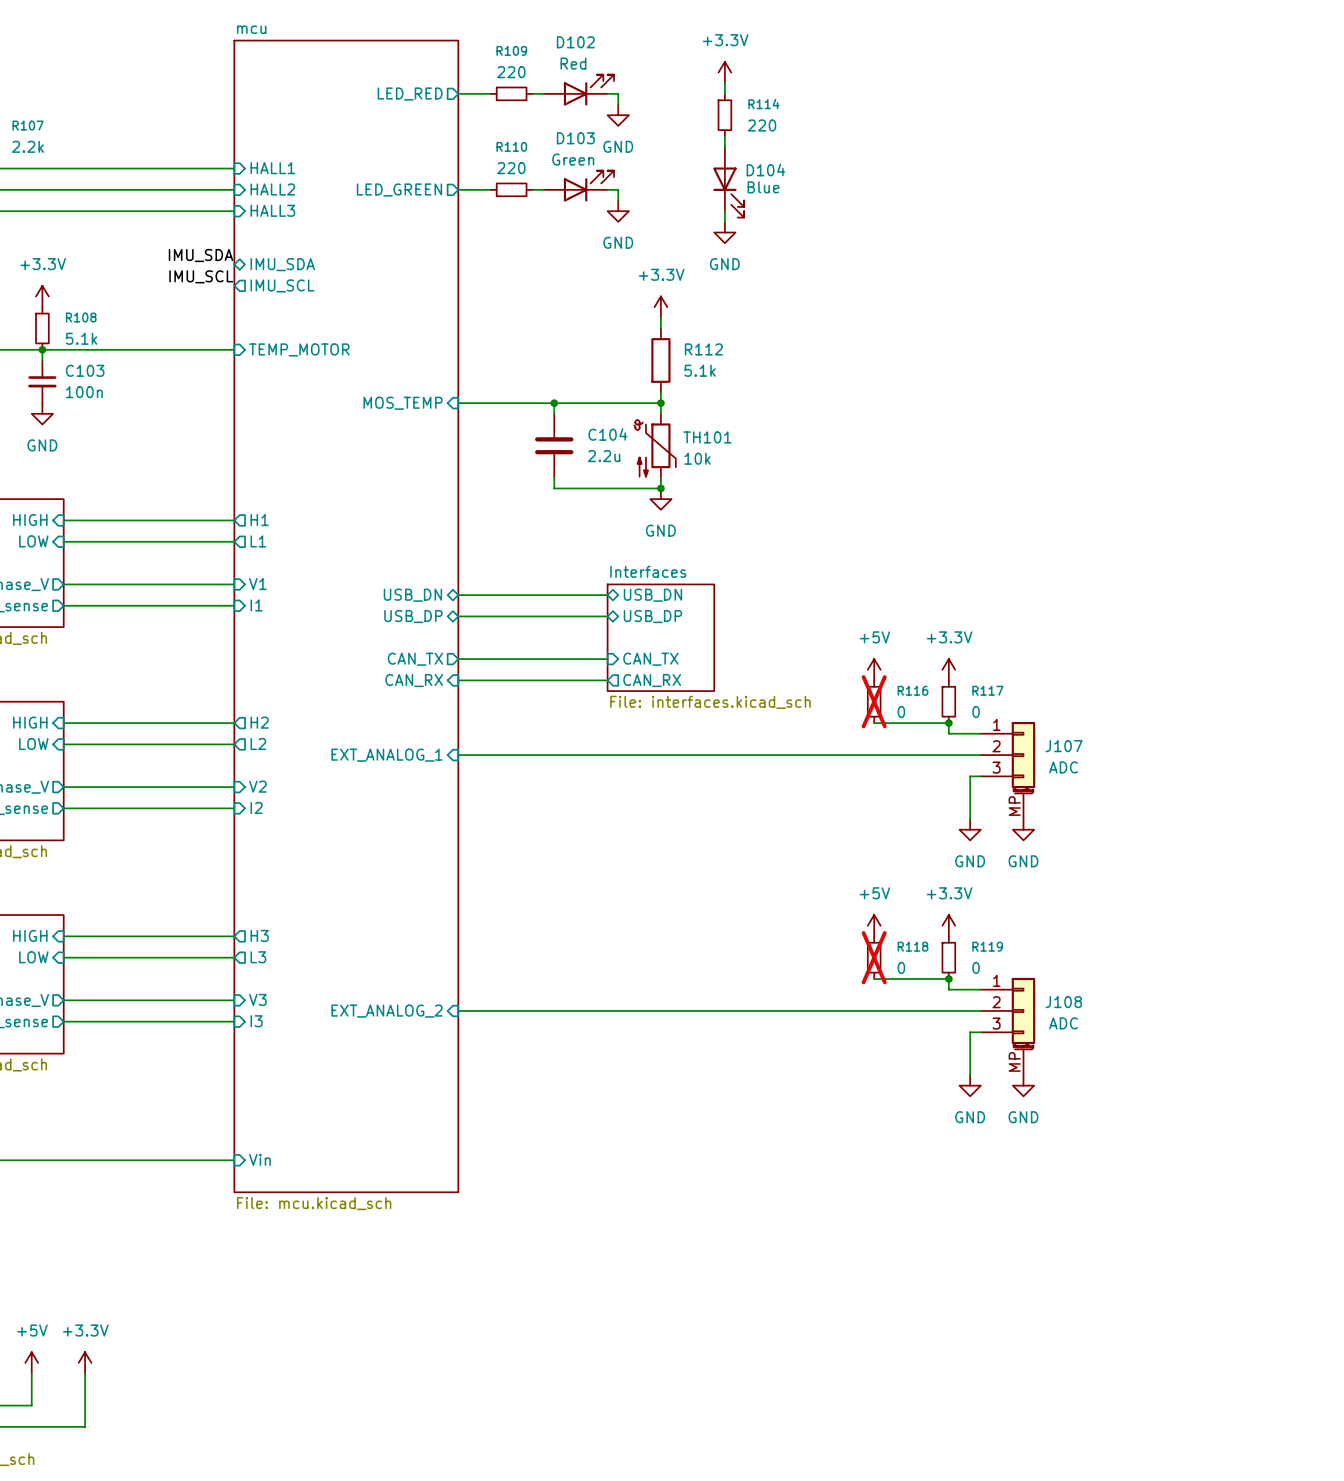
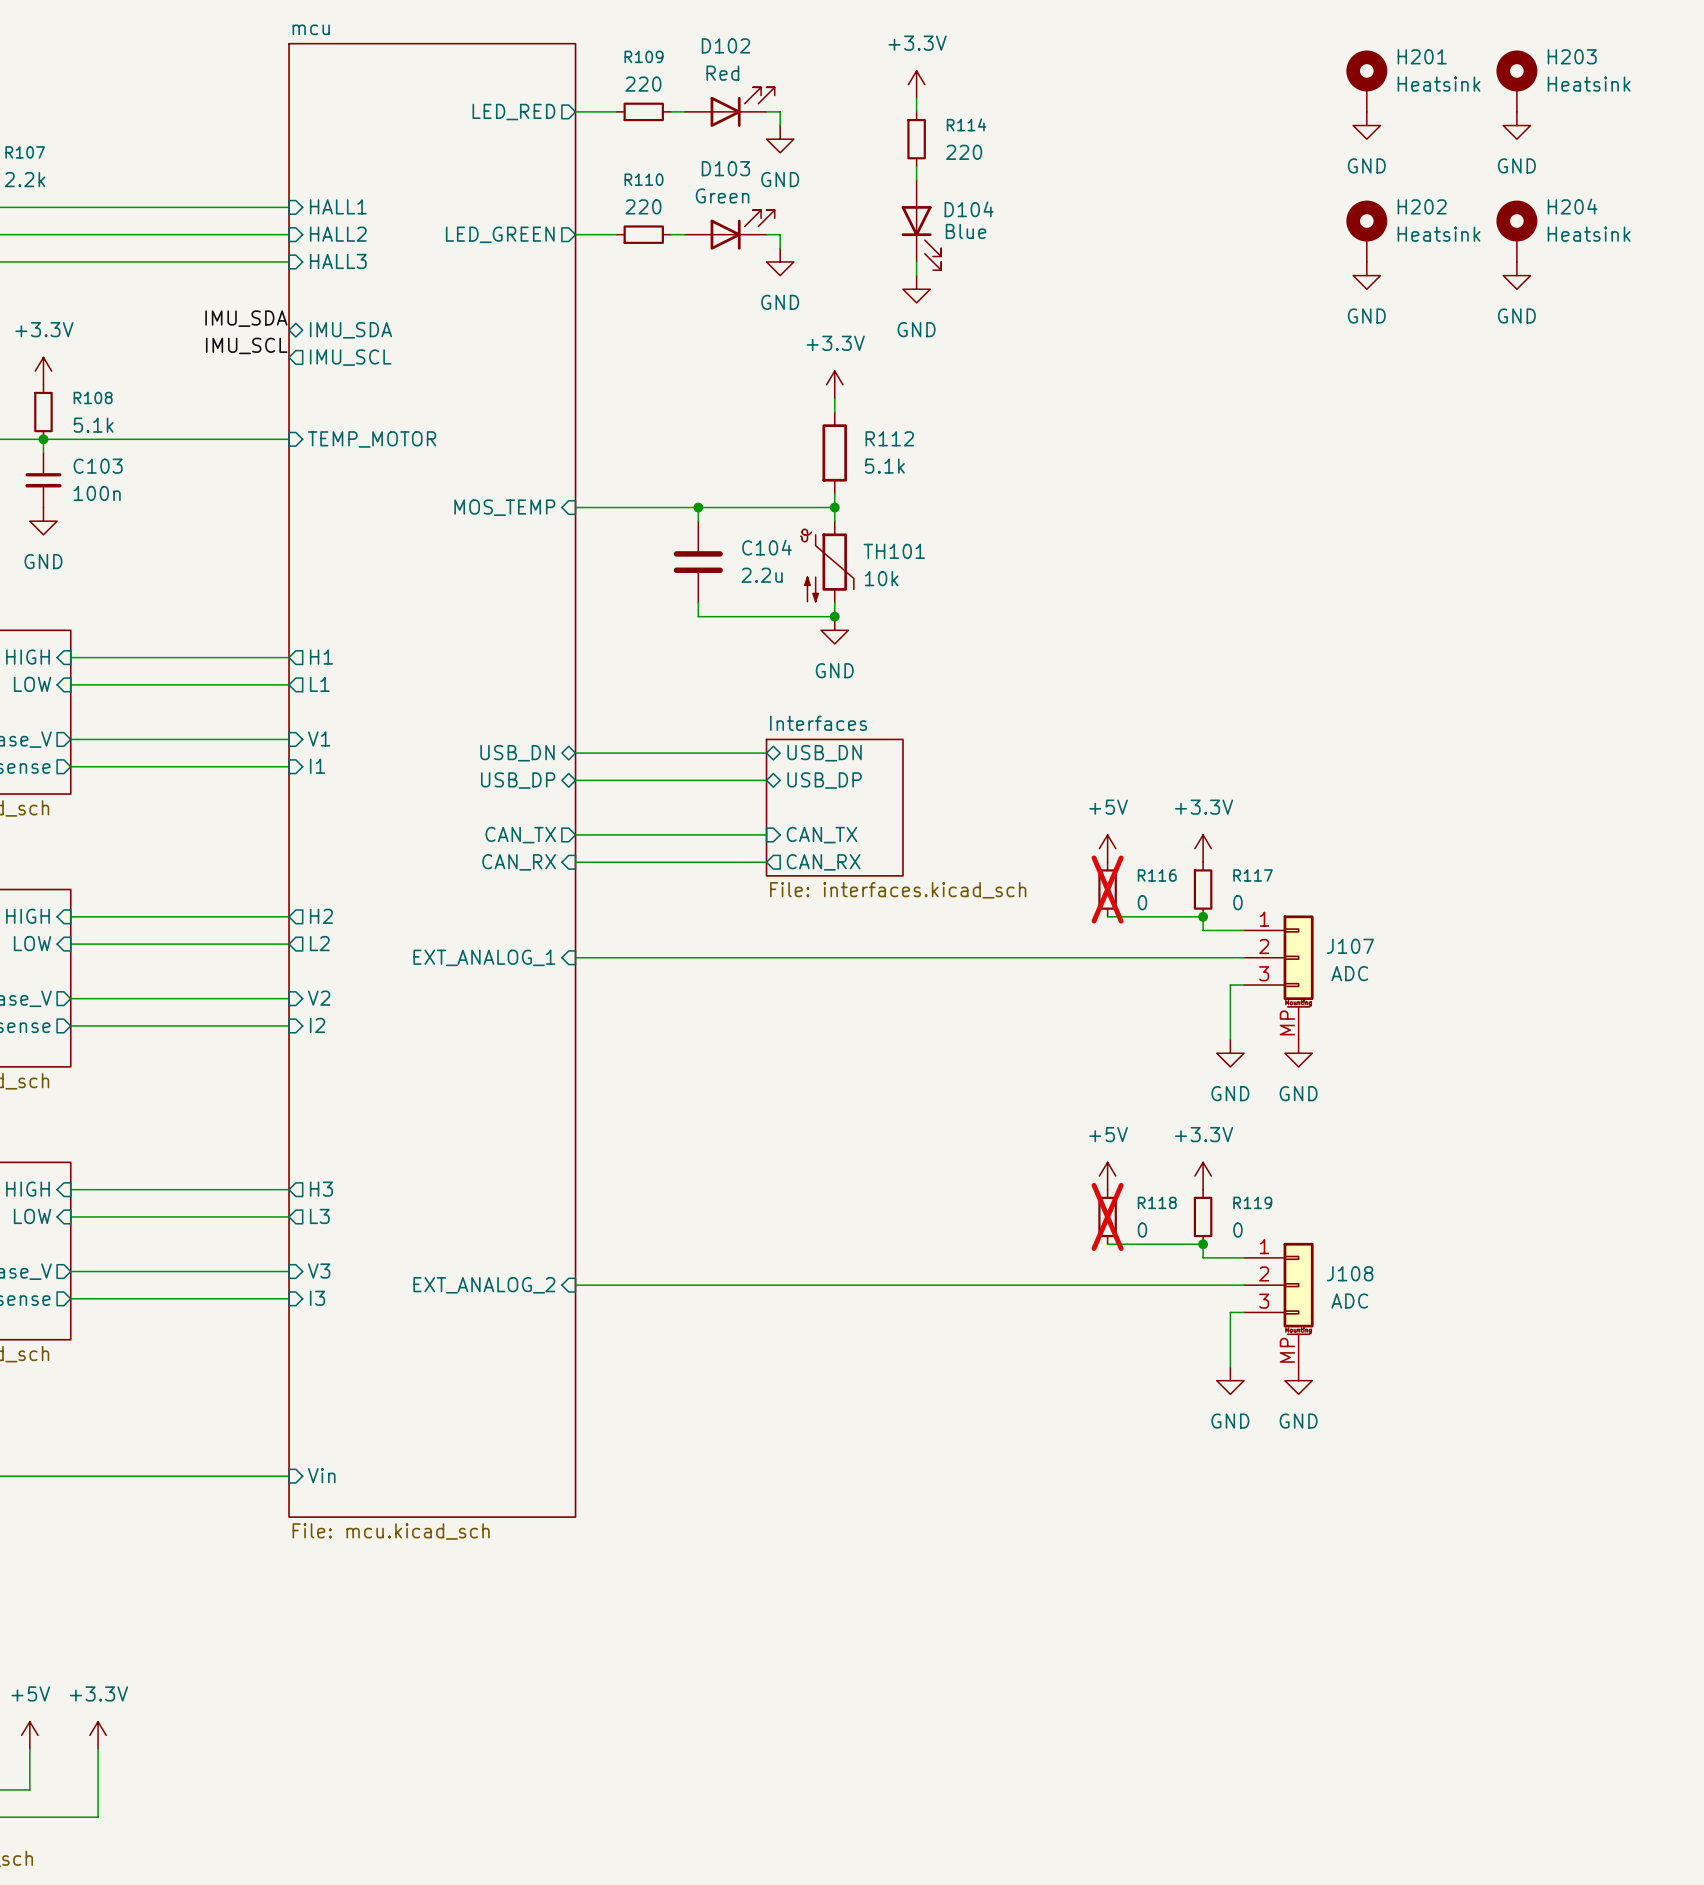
H201: none -> Heatsink (1366, 81)
H203: none -> Heatsink (1516, 81)
power symbol: none -> GND (1366, 125)
power symbol: none -> GND (1516, 125)
H202: none -> Heatsink (1366, 231)
H204: none -> Heatsink (1516, 231)
power symbol: none -> GND (1366, 275)
power symbol: none -> GND (1516, 275)

